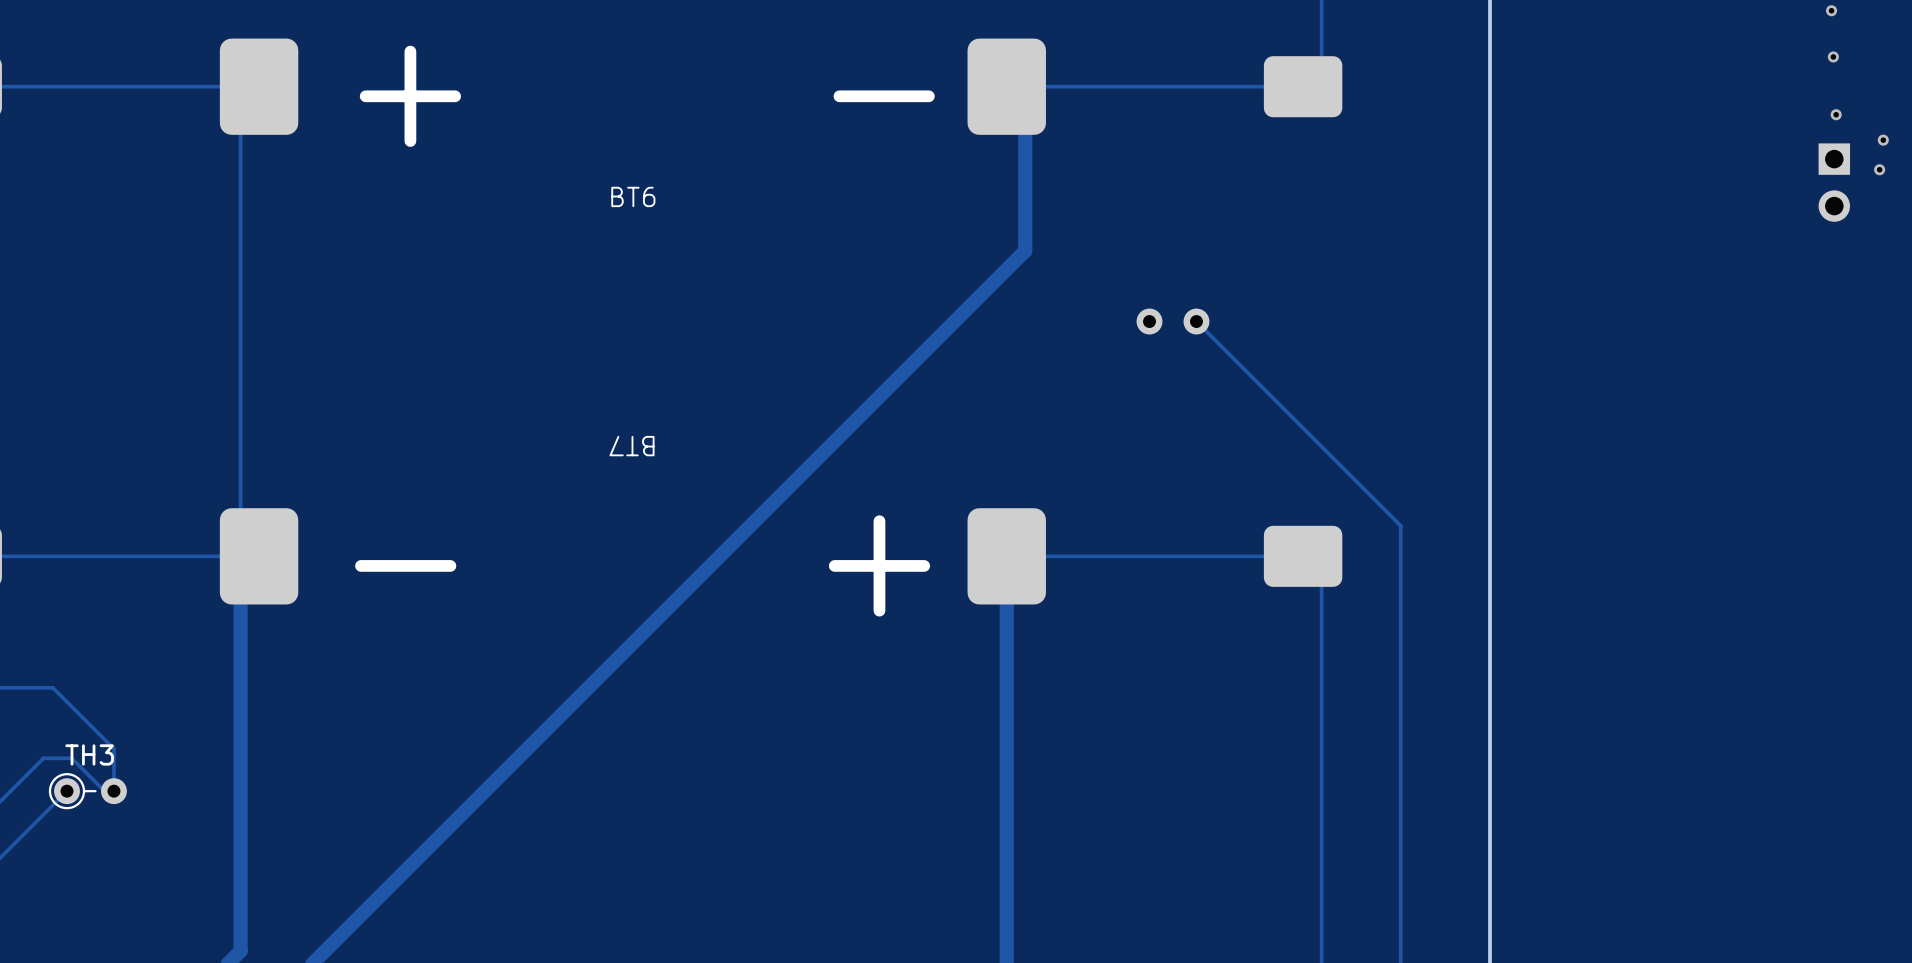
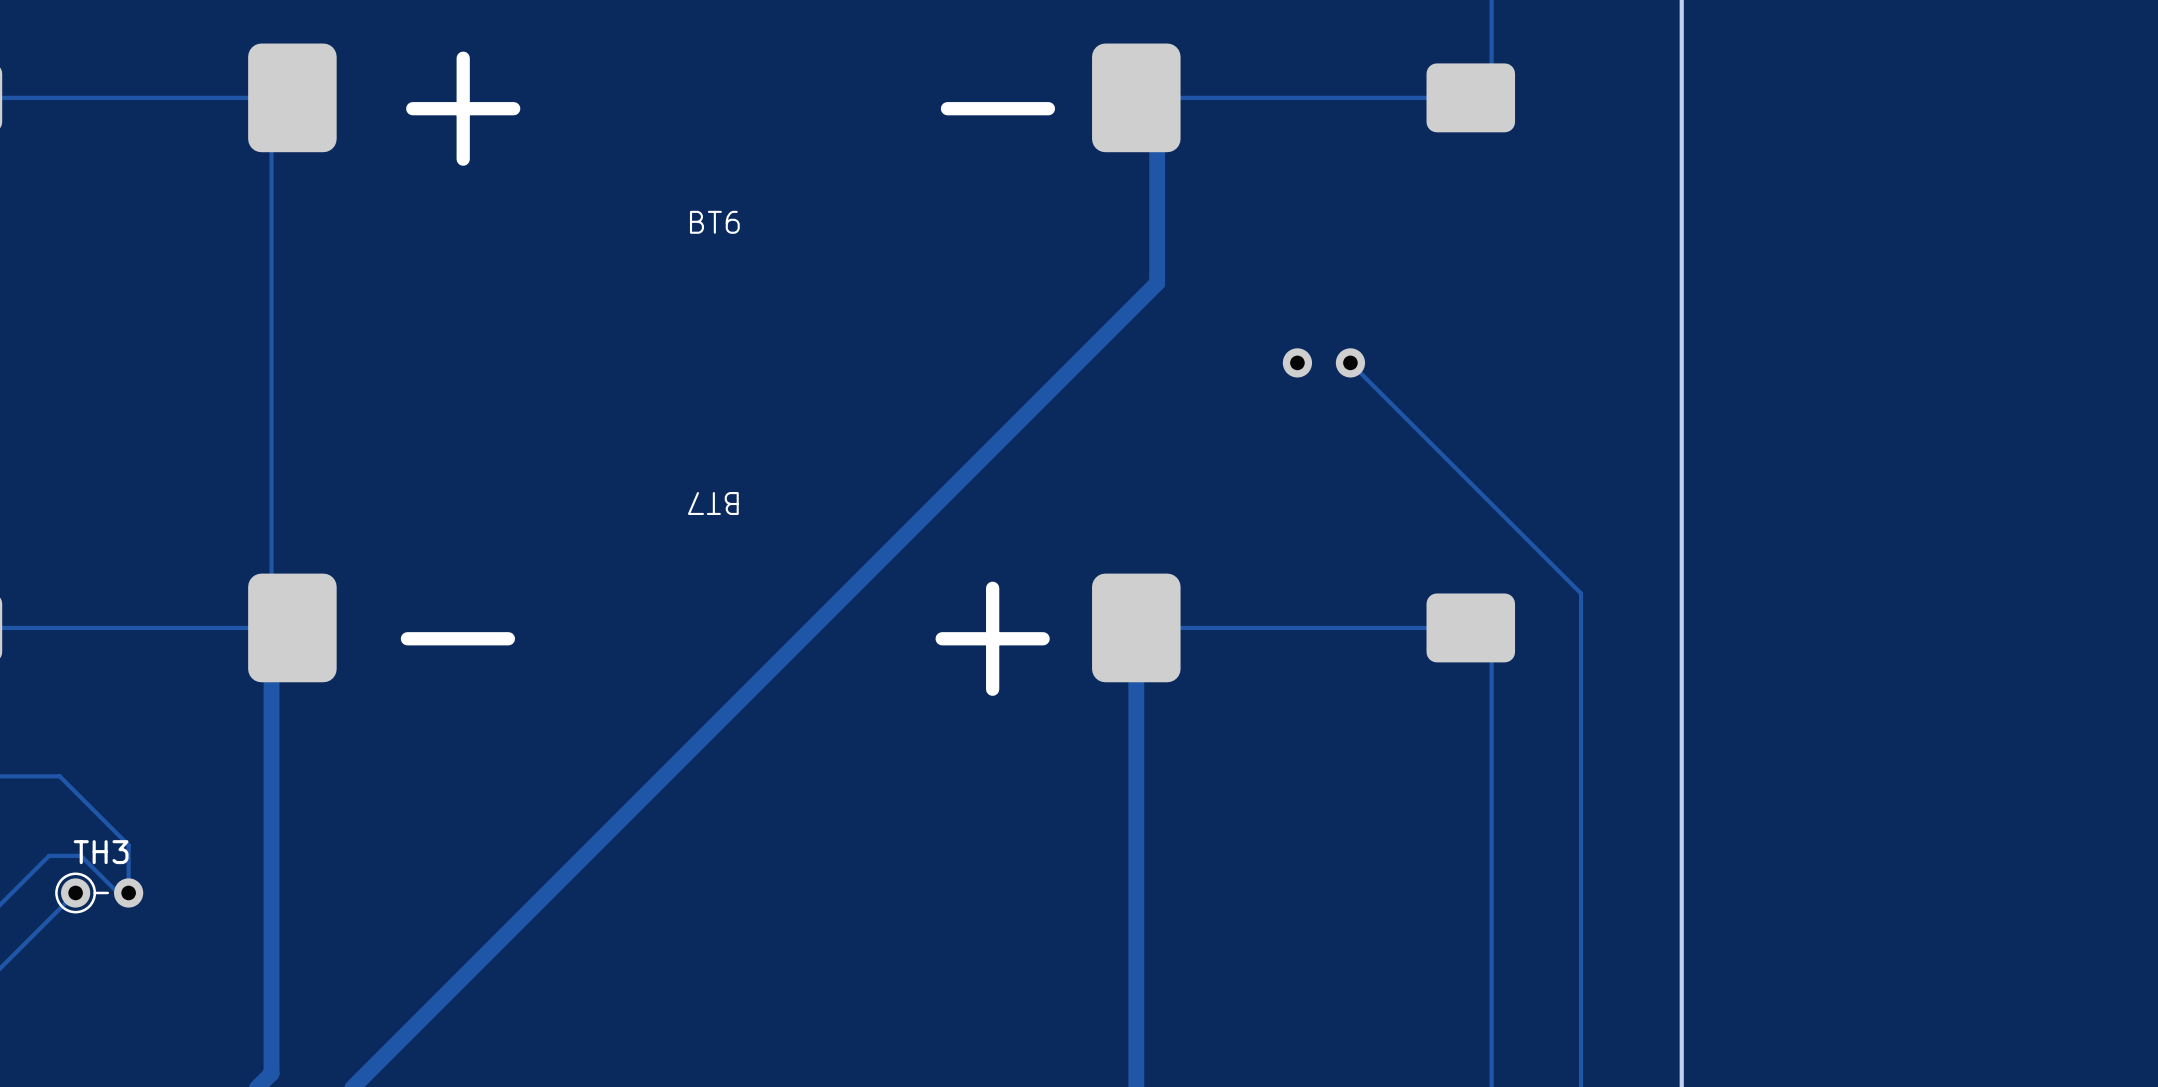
via: (1831, 10) -> none
via: (1833, 56) -> none
via: (1836, 114) -> none
via: (1883, 140) -> none
via: (1879, 169) -> none
part: (1834, 182) -> none

